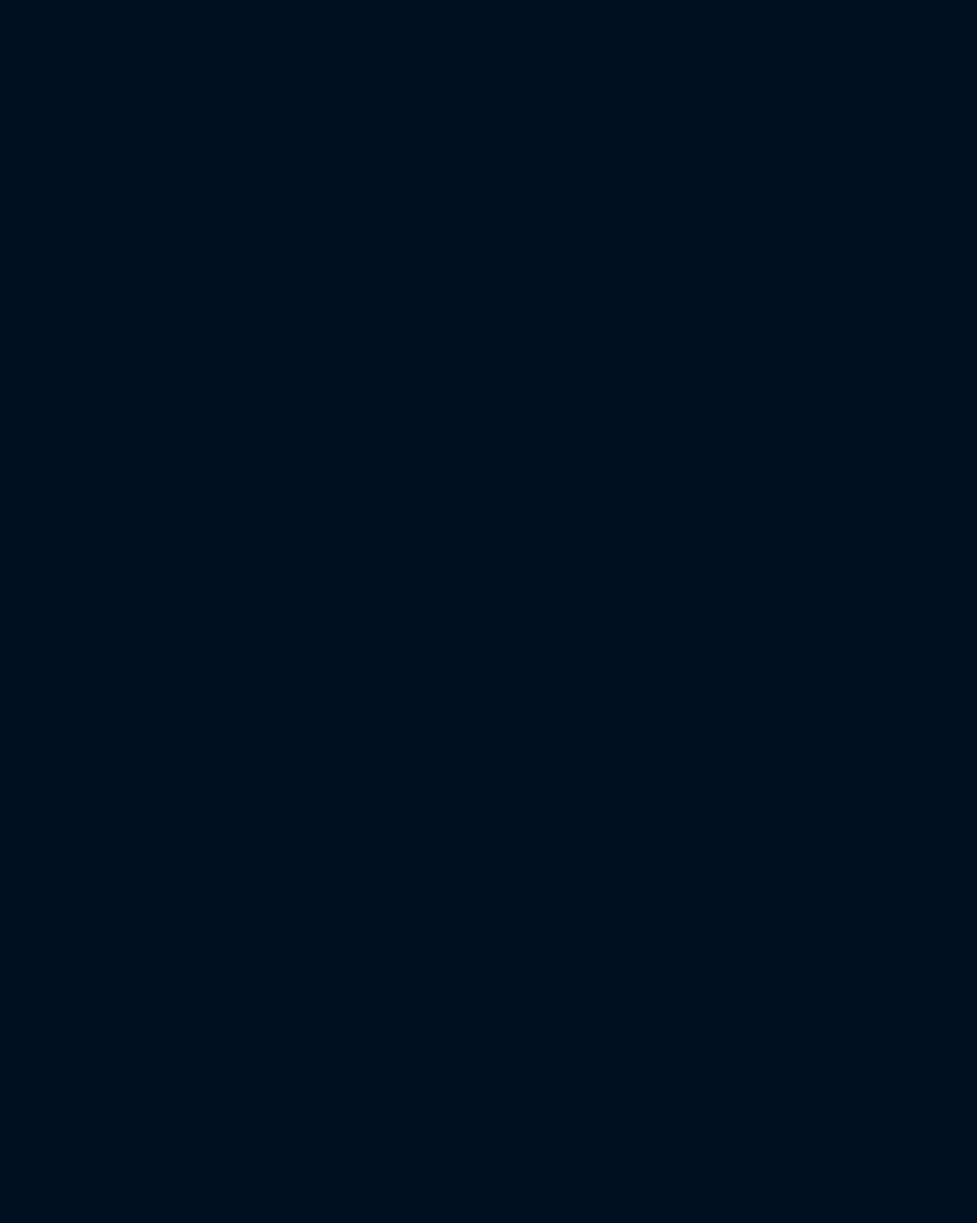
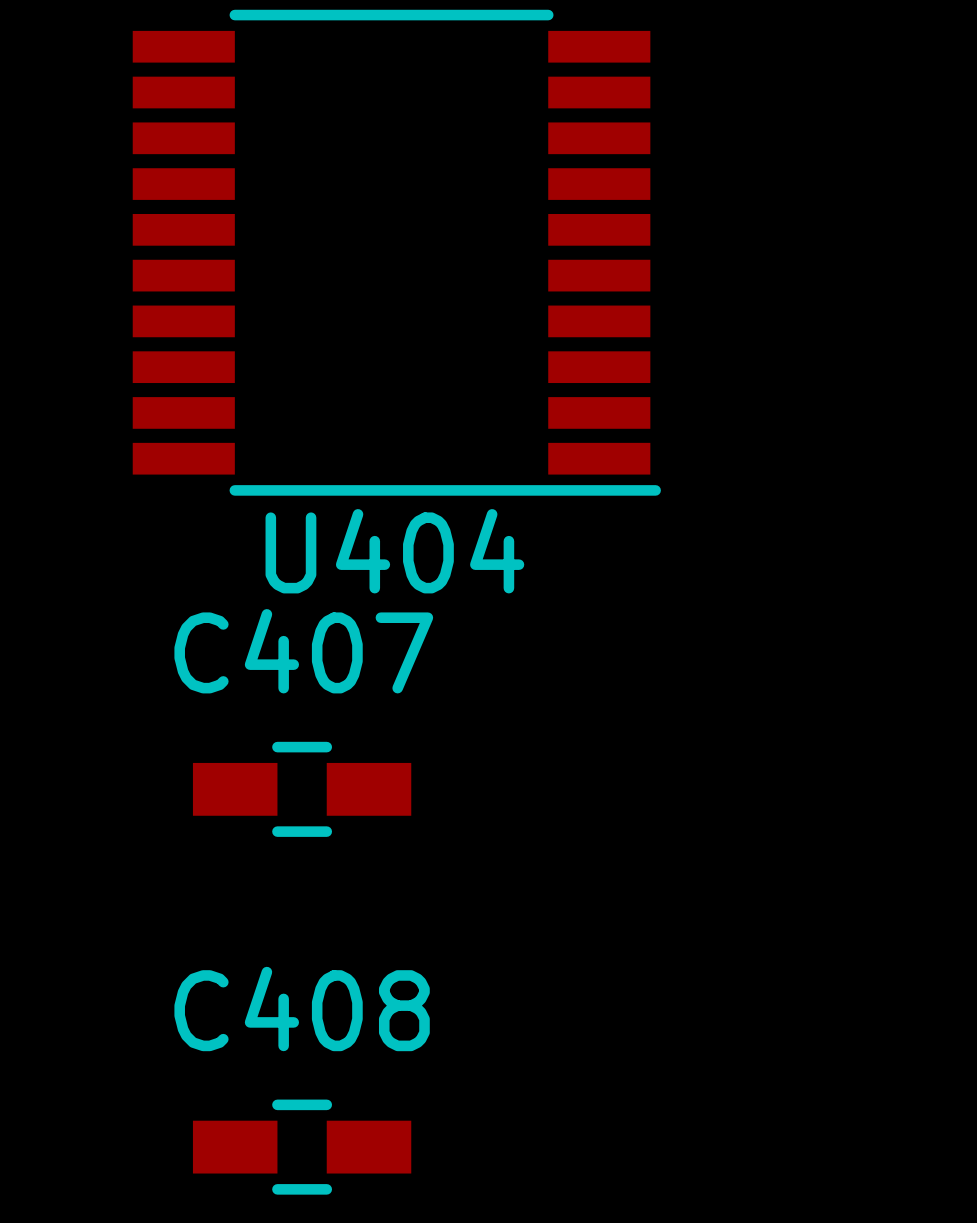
U404: none -> (396, 252)
C407: none -> (302, 789)
C408: none -> (302, 1147)

